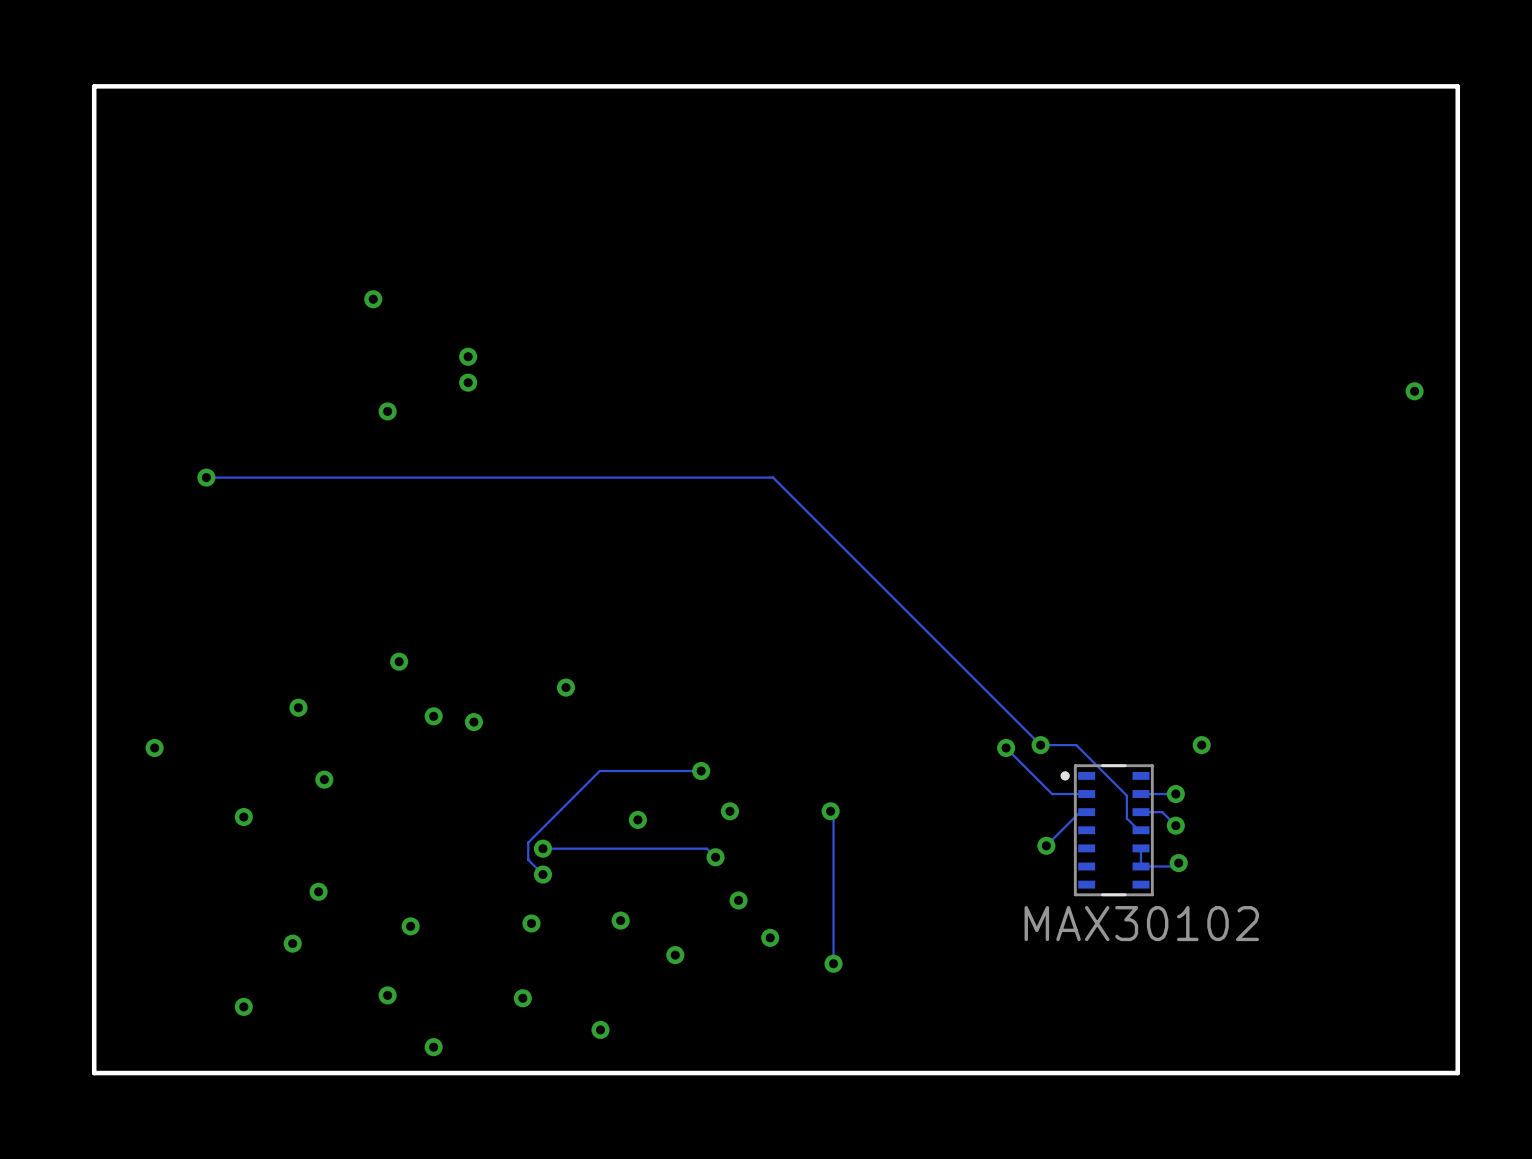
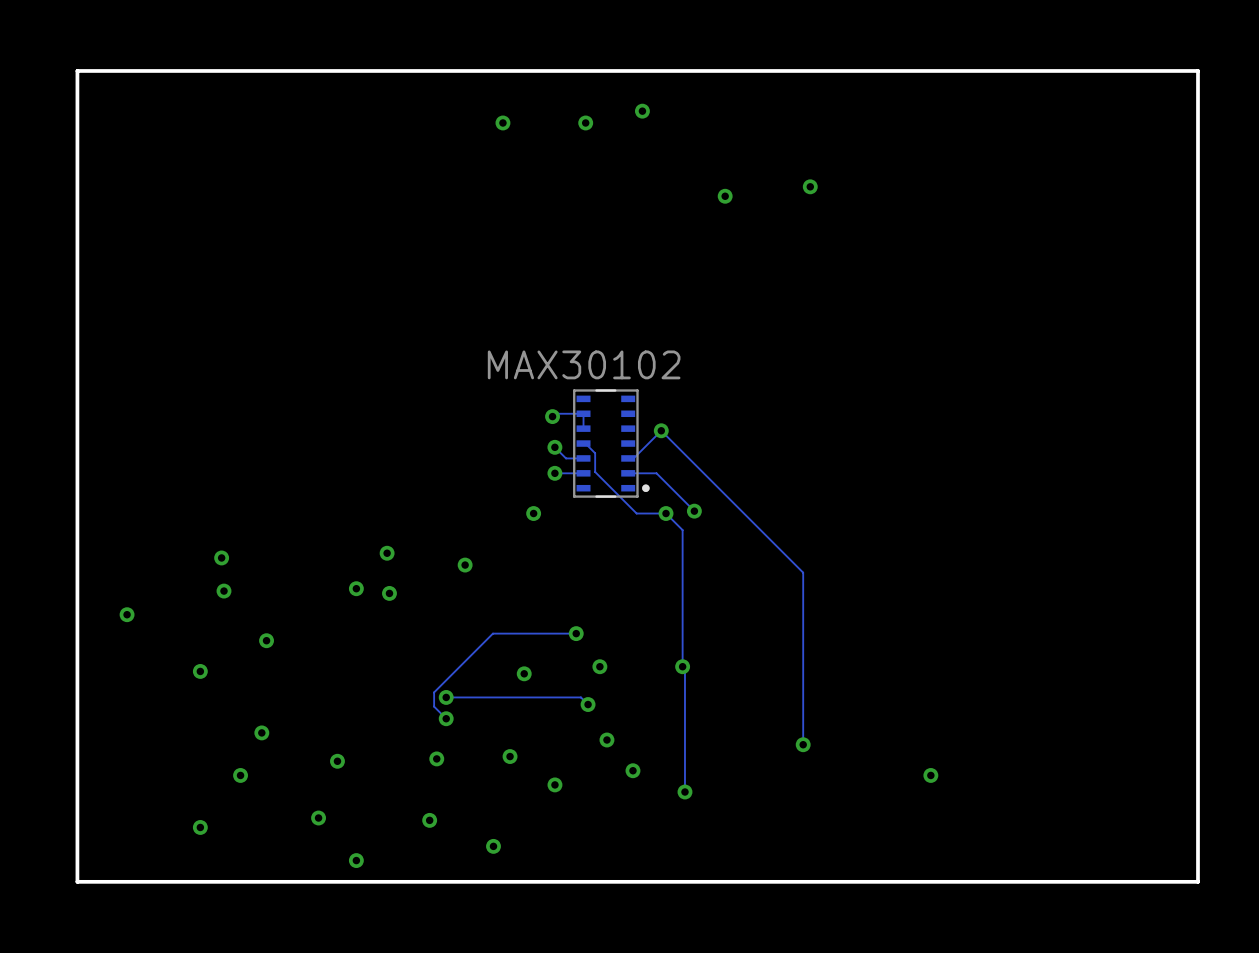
via: none -> (642, 111)
via: none -> (502, 122)
via: none -> (585, 122)
via: none -> (810, 186)
via: none -> (725, 196)
via: (373, 299) -> none
via: (468, 356) -> none
via: (468, 382) -> none
via: (1414, 391) -> none
via: (387, 411) -> none
track: (206, 477) (773, 477) (1040, 745) (1076, 745) (1126, 795) (1126, 818) (1138, 830) (1141, 830) -> none
via: (206, 477) -> none
track: none -> (552, 416) (555, 413) (583, 413) (583, 428)
via: none -> (552, 416)
via: none -> (661, 430)
track: none -> (583, 443) (595, 453) (595, 471) (636, 513) (666, 513) (682, 530) (682, 666)
track: none -> (554, 447) (566, 458) (583, 458)
via: none -> (554, 447)
track: none -> (628, 458) (633, 458) (661, 430) (803, 572) (803, 744)
via: none -> (554, 473)
track: none -> (628, 473) (656, 473) (694, 511)
via: none -> (694, 511)
via: none -> (533, 513)
via: none -> (666, 513)
via: (399, 661) -> none
via: none -> (387, 553)
via: none -> (221, 557)
via: (298, 707) -> none
via: none -> (223, 591)
via: (1040, 745) -> none
via: (1201, 745) -> none
track: (1006, 747) (1052, 794) (1086, 794) -> none
via: (1006, 747) -> none
track: (1175, 794) (1141, 794) -> (583, 473) (554, 473)
via: (1175, 794) -> none
track: (1086, 812) (1080, 812) (1046, 845) -> none
track: (1141, 812) (1162, 812) (1175, 825) -> none
via: (1175, 825) -> none
part rotation: 0° (1107, 830) -> 180° (611, 443)
part position: (1107, 830) -> (611, 443)
via: (1046, 845) -> none
track: (1141, 848) (1141, 866) (1175, 866) (1178, 863) -> none
via: (1178, 863) -> none
via: none -> (803, 744)
via: none -> (930, 775)

